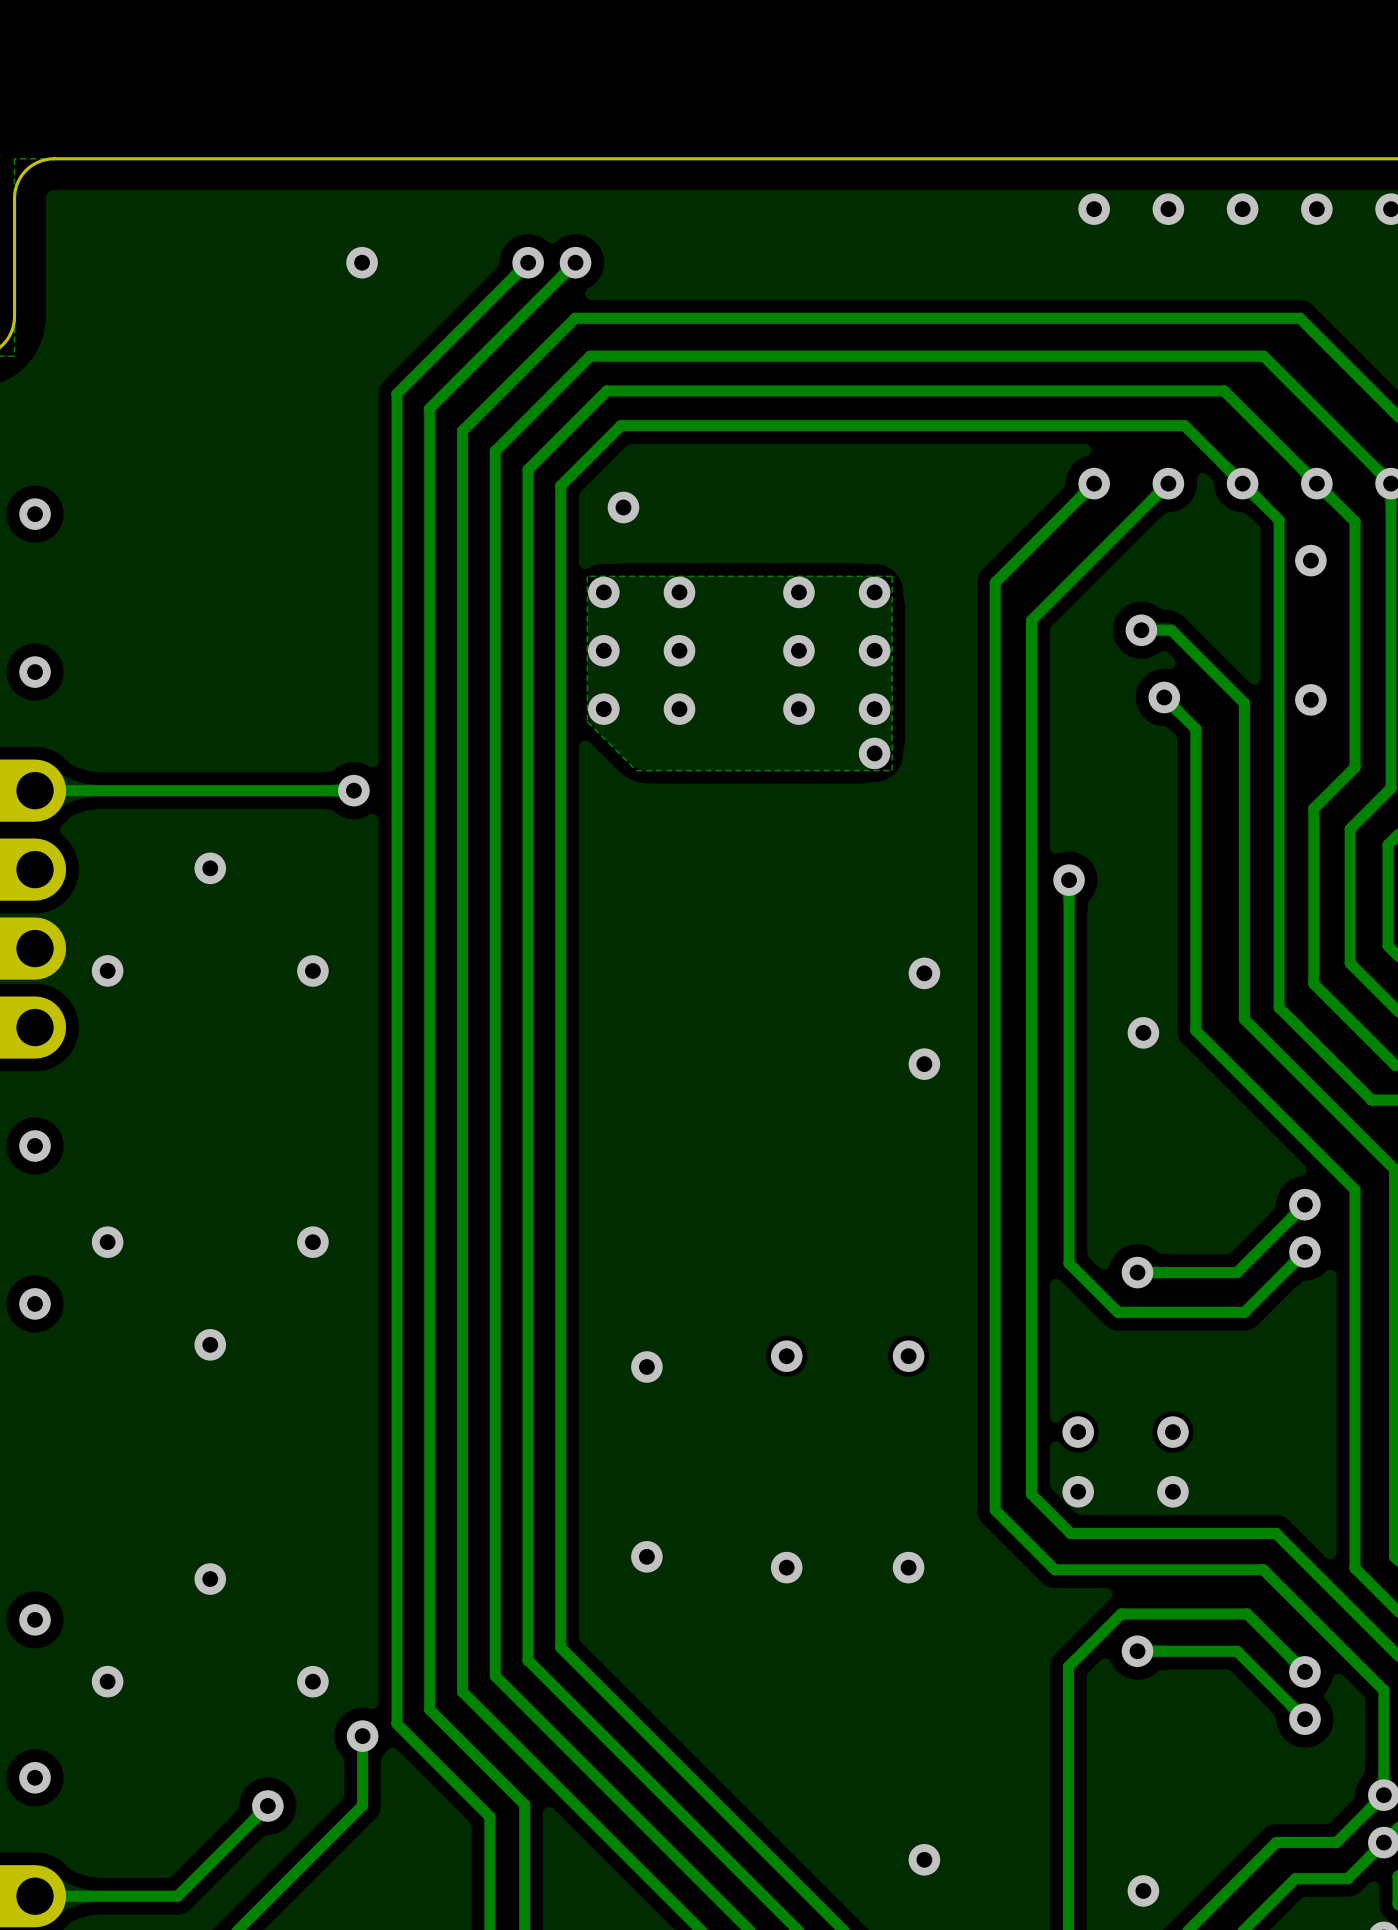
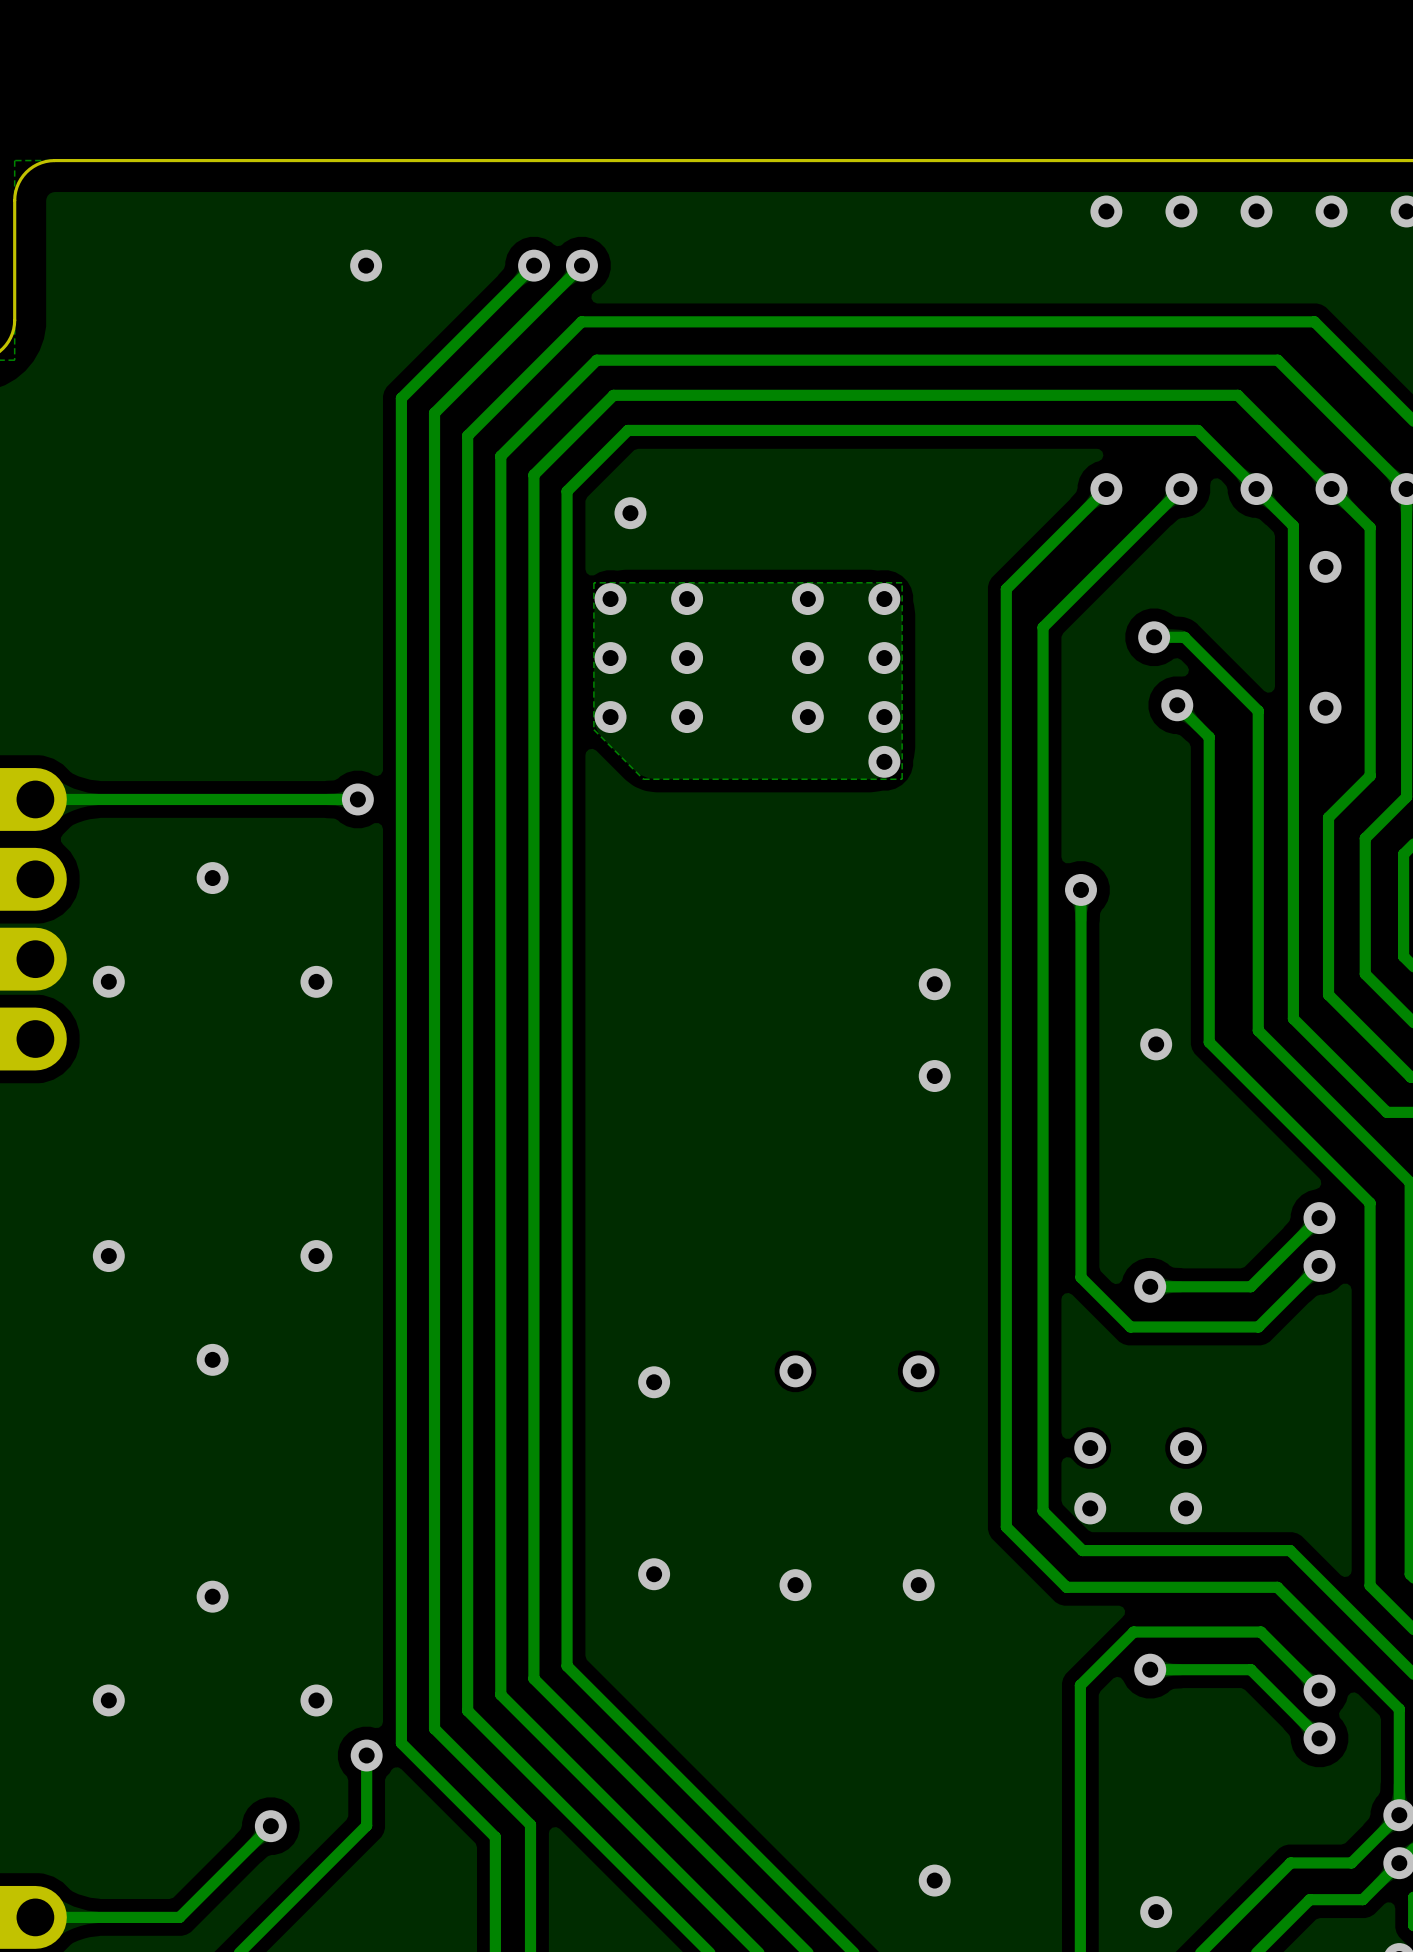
via: (35, 514) -> none
via: (35, 672) -> none
via: (35, 1145) -> none
via: (35, 1303) -> none
via: (35, 1619) -> none
via: (35, 1777) -> none

